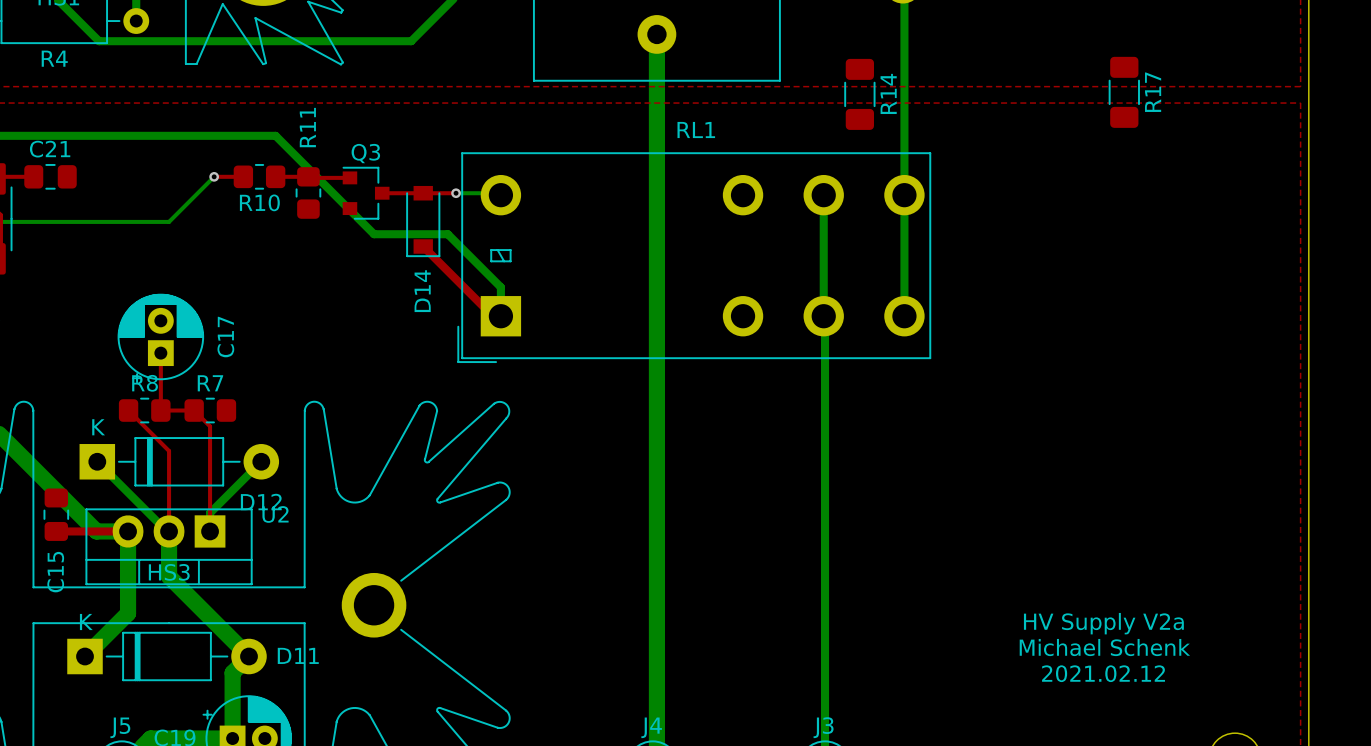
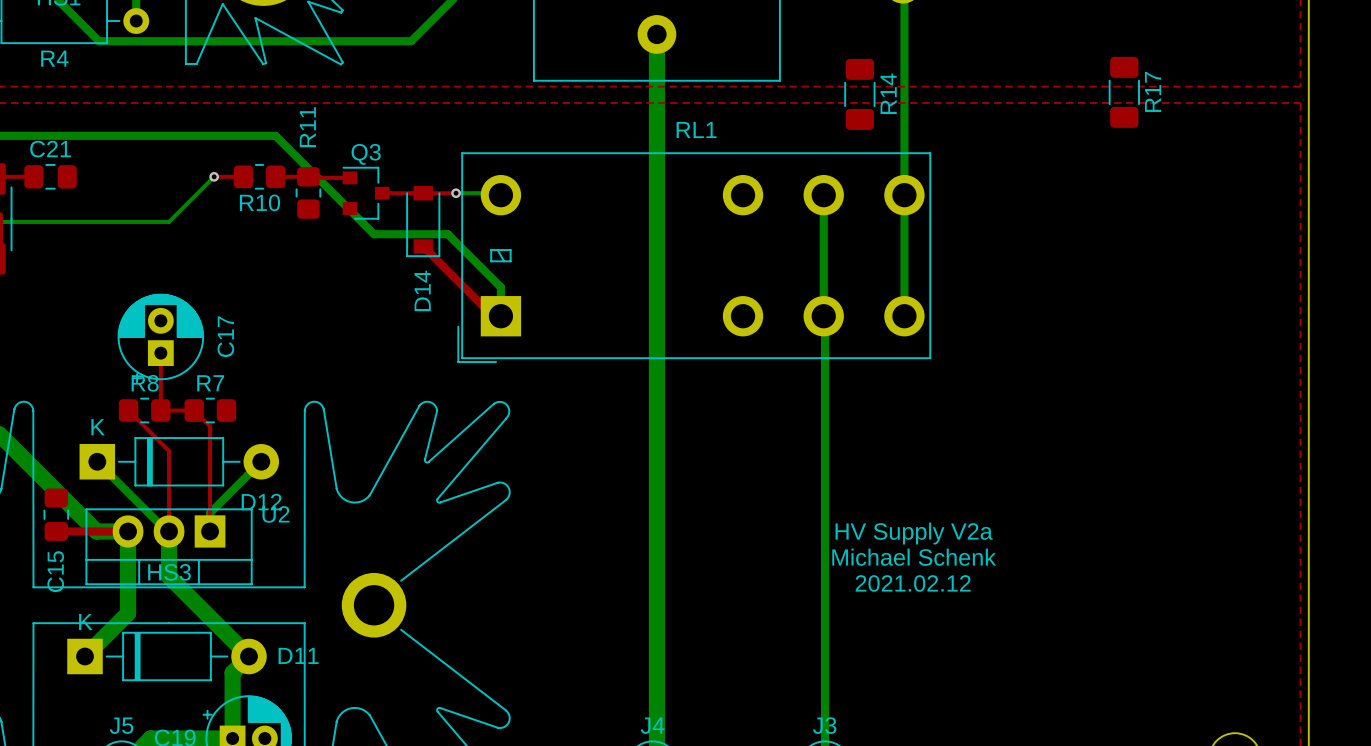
text position: HV Supply V2a (1103, 623) -> HV Supply V2a (914, 533)
text position: Michael Schenk (1104, 647) -> Michael Schenk (914, 557)
text position: 2021.02.12 (1103, 673) -> 2021.02.12 (913, 583)

